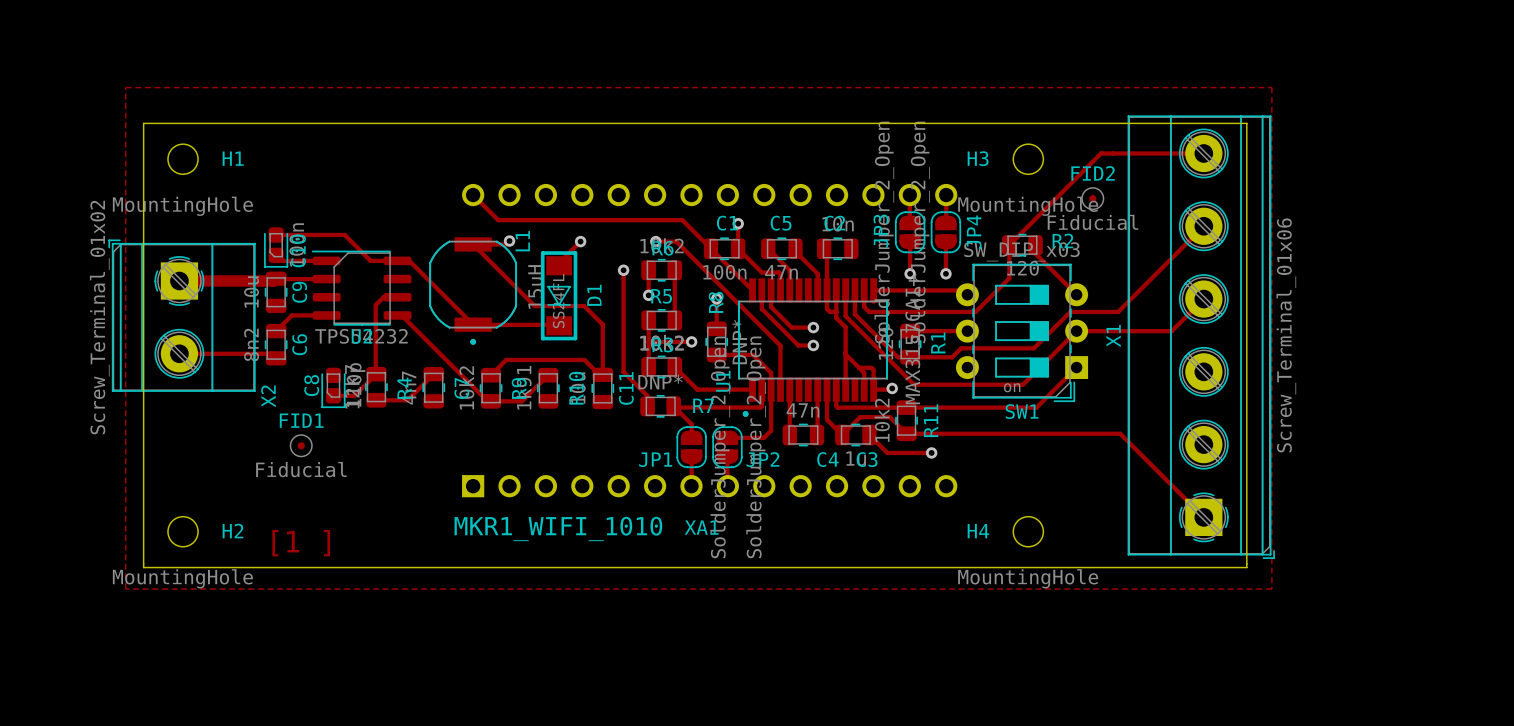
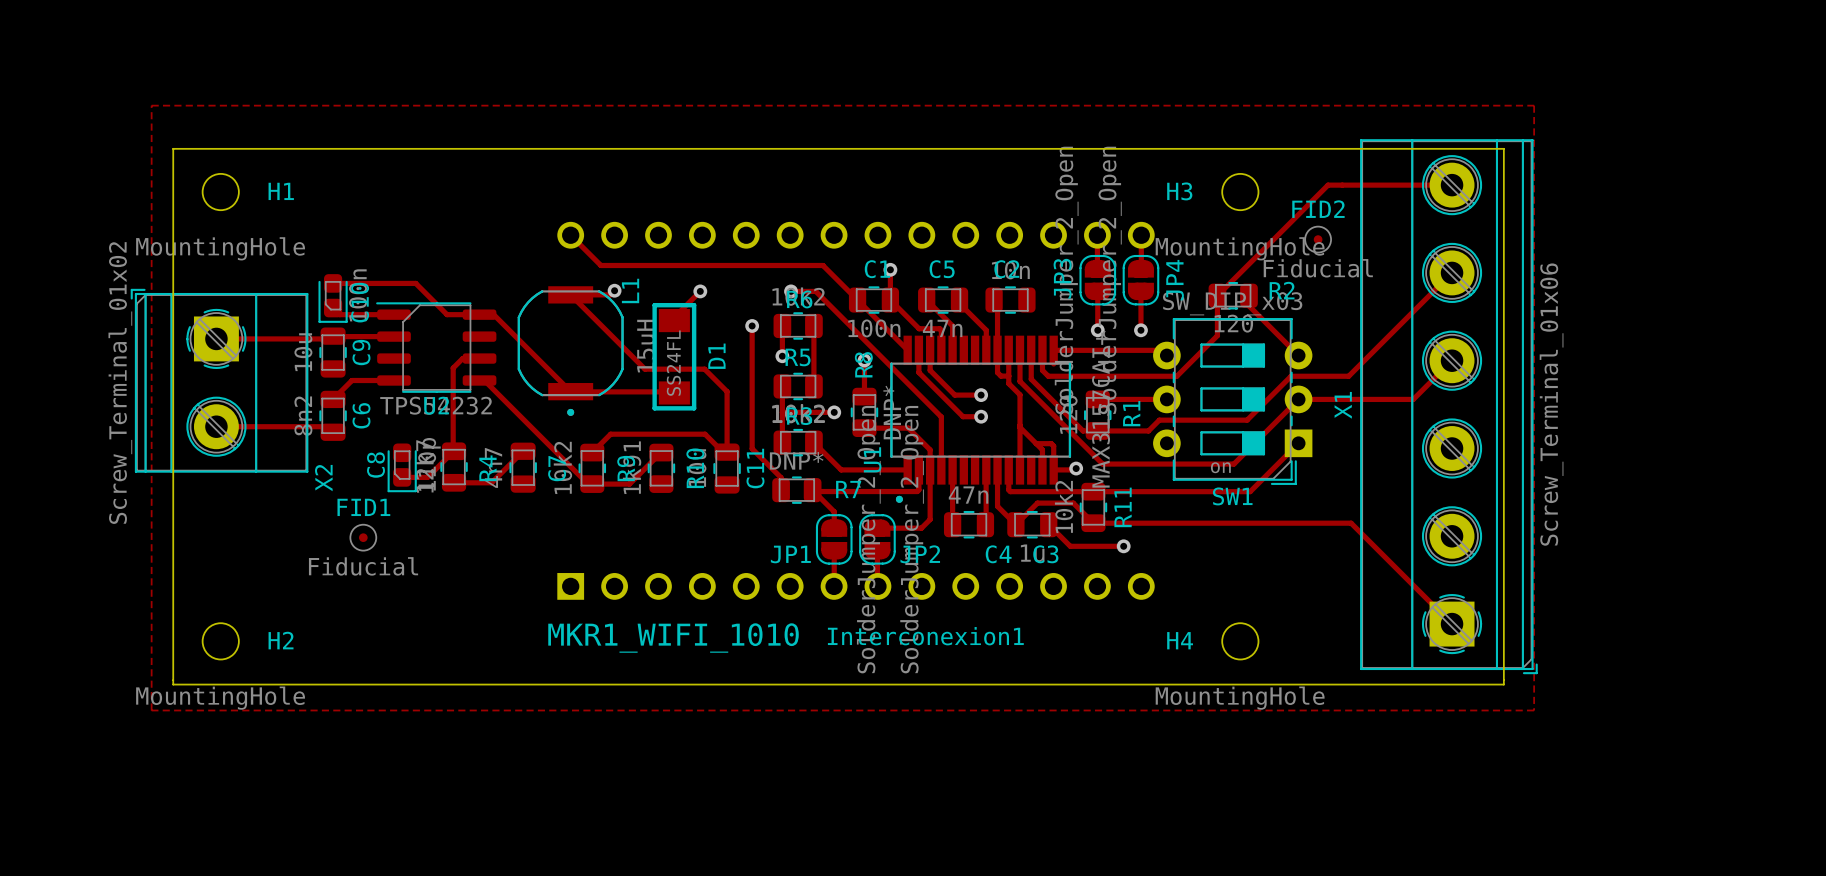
D1 footprint: [540, 251, 578, 341] -> [652, 303, 697, 411]
track width: thick (276, 278) (273, 281) (179, 281) -> thin (333, 336) (330, 338) (216, 338)
XA1 name: XA1 (701, 527) -> Interconexion1 (925, 636)
text: [1 ] (301, 543) -> none

